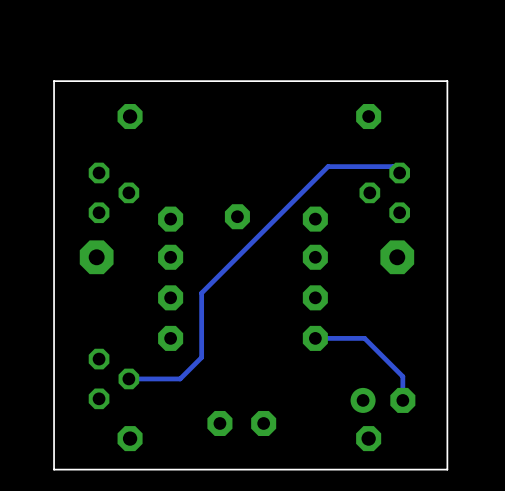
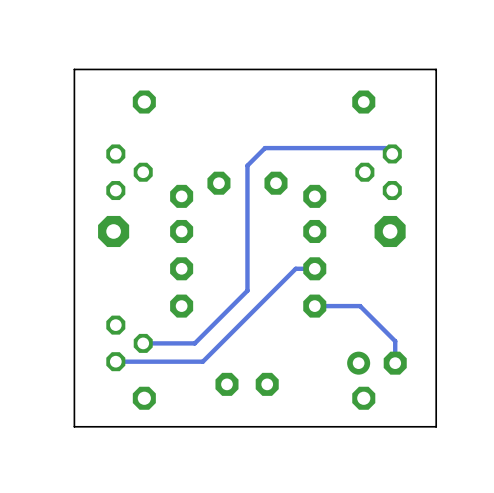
track: (328, 166) (201, 293) (201, 357) (180, 378) -> (326, 148) (265, 148) (247, 165) (247, 290) (194, 343) (190, 343)
part: none -> (218, 183)
part: none -> (275, 183)
part: (237, 216) -> none
track: none -> (314, 268) (295, 268) (202, 361) (115, 361)

